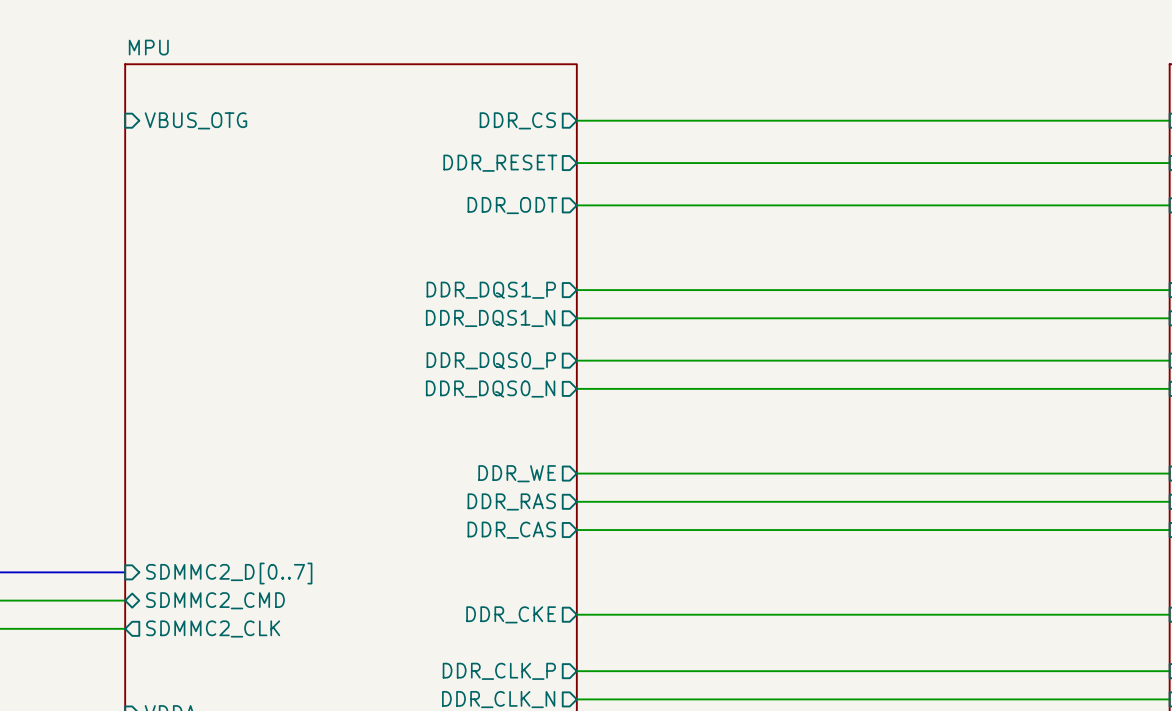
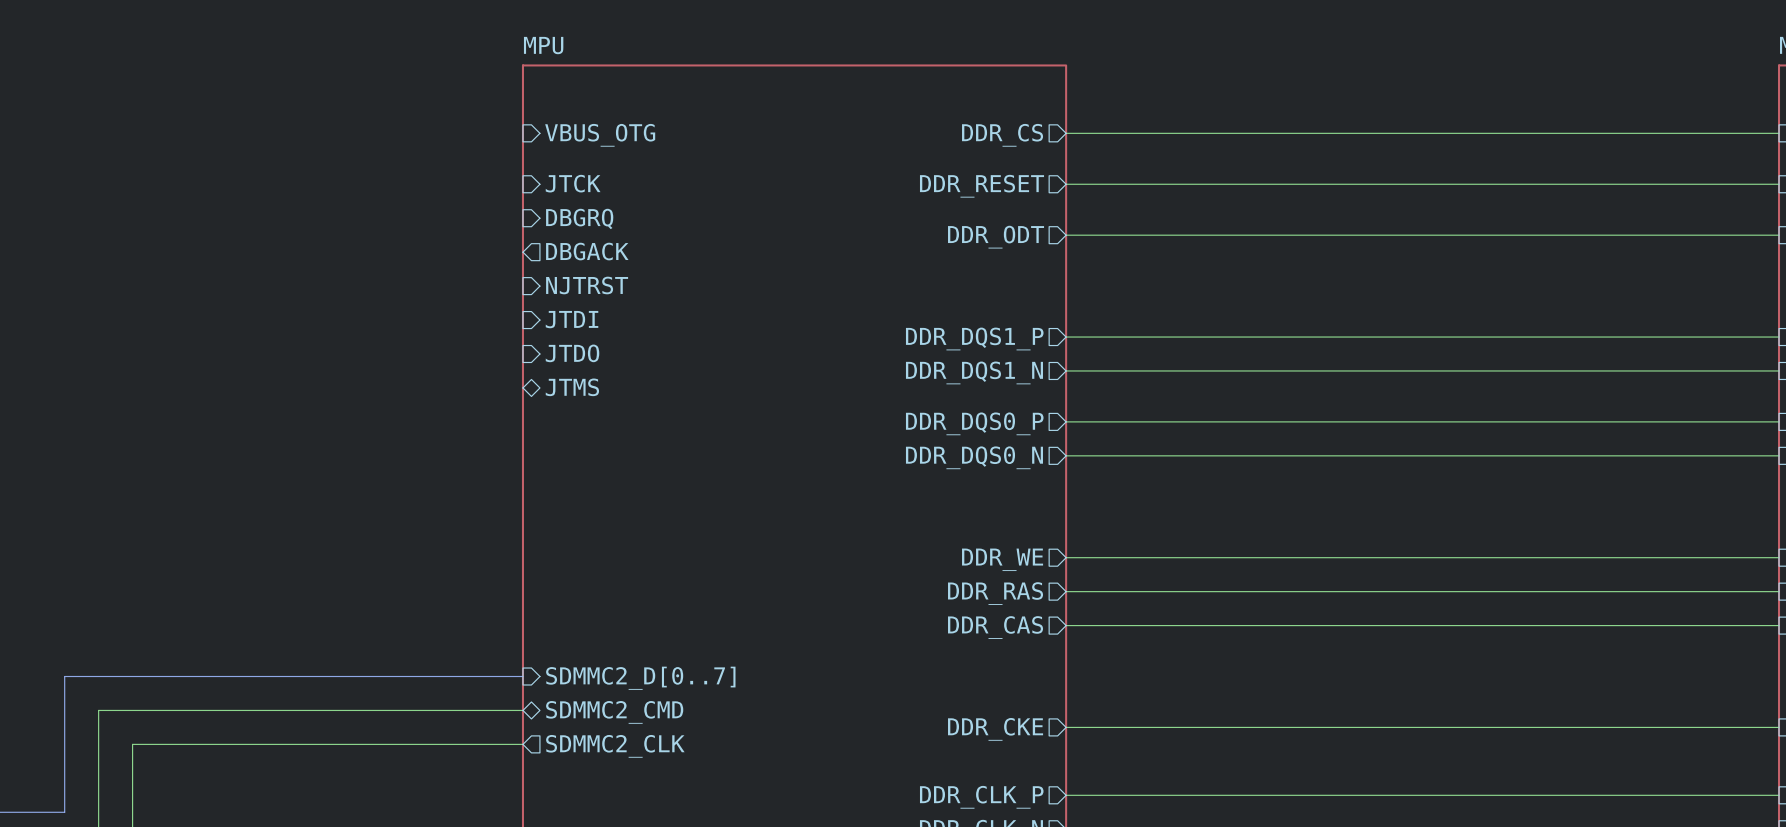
sheet pin: none -> JTCK (573, 183)
sheet pin: none -> DBGRQ (579, 218)
sheet pin: none -> DBGACK (587, 251)
sheet pin: none -> NJTRST (587, 285)
sheet pin: none -> JTDI (572, 319)
sheet pin: none -> JTDO (572, 353)
sheet pin: none -> JTMS (572, 387)

